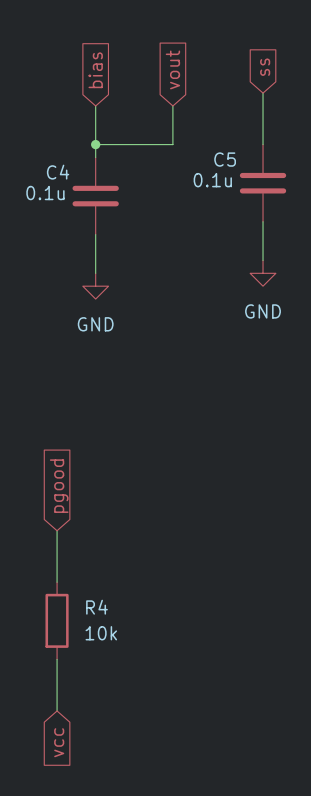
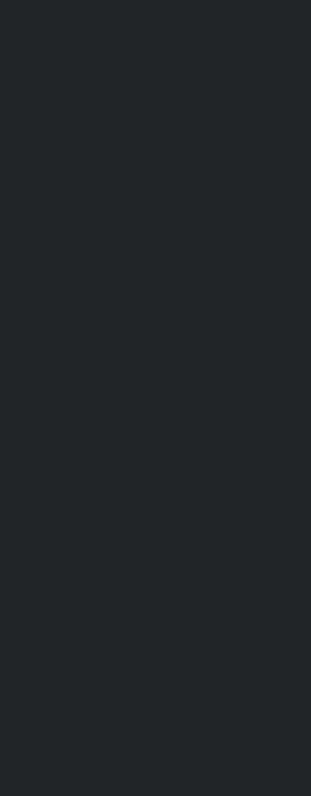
global label: ss (265, 67) -> none
global label: vout (172, 69) -> none
global label: bias (95, 70) -> none
wire: (263, 93) (263, 144) -> none
wire: (95, 105) (95, 157) -> none
wire: (172, 105) (172, 144) (95, 144) -> none
junction: (95, 144) -> none
C5: 0.1u (263, 183) -> none
C4: 0.1u (95, 196) -> none
wire: (263, 221) (263, 260) -> none
wire: (95, 234) (95, 273) -> none
power symbol: GND (263, 273) -> none
power symbol: GND (95, 286) -> none
global label: pgood (59, 486) -> none
wire: (57, 530) (57, 582) -> none
R4: 10k (57, 620) -> none
wire: (57, 659) (57, 710) -> none
global label: vcc (59, 742) -> none

